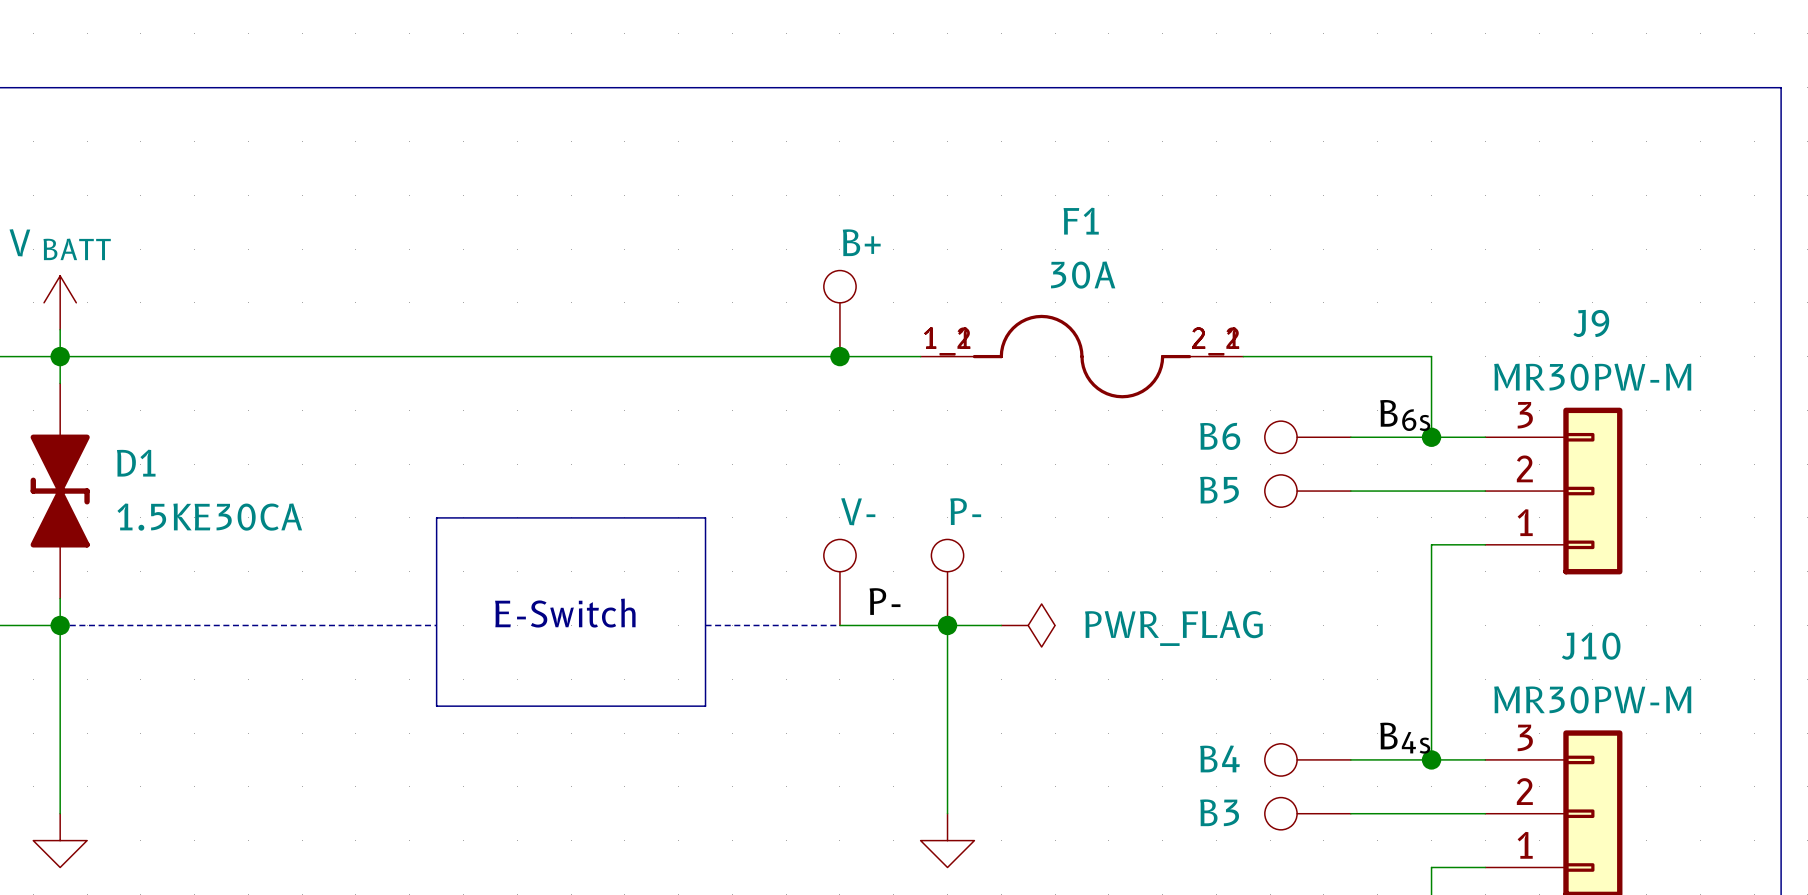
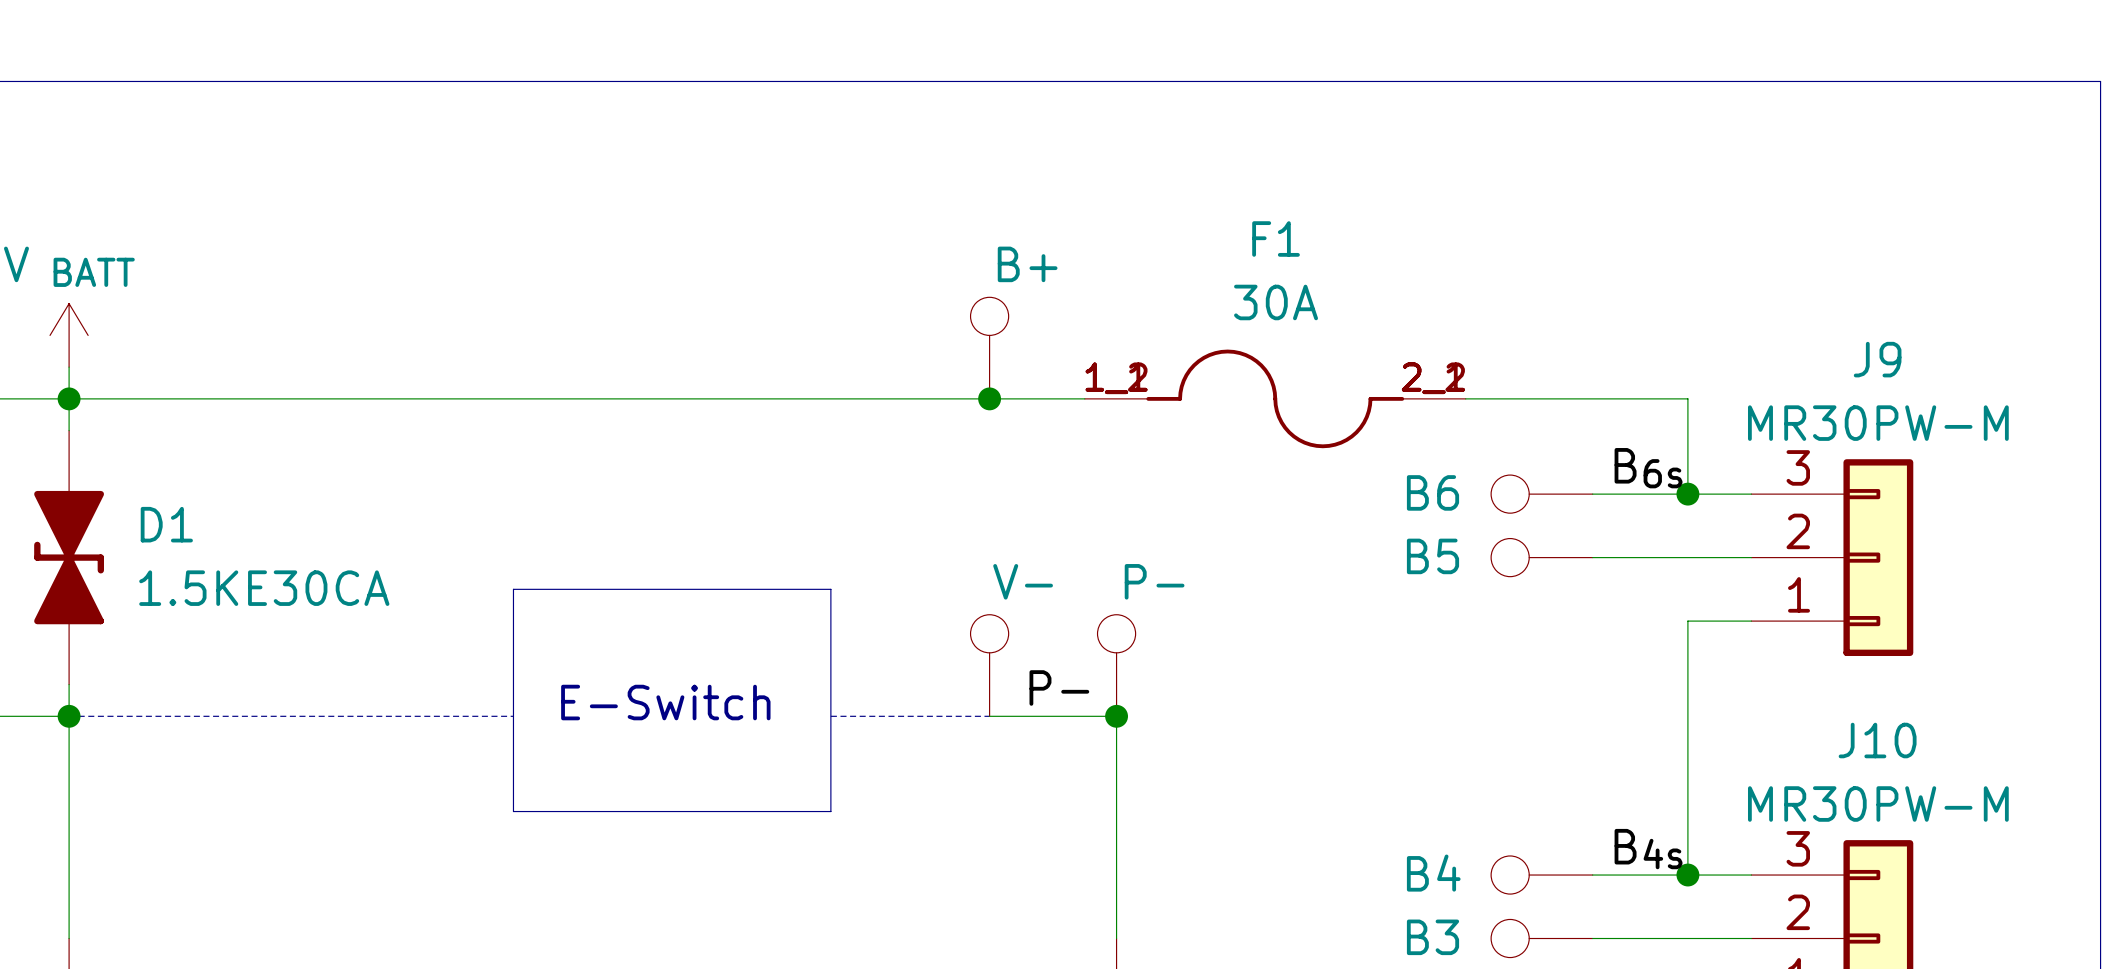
wire: (947, 625) (1001, 625) -> none
power symbol: PWR_FLAG (1028, 625) -> none

